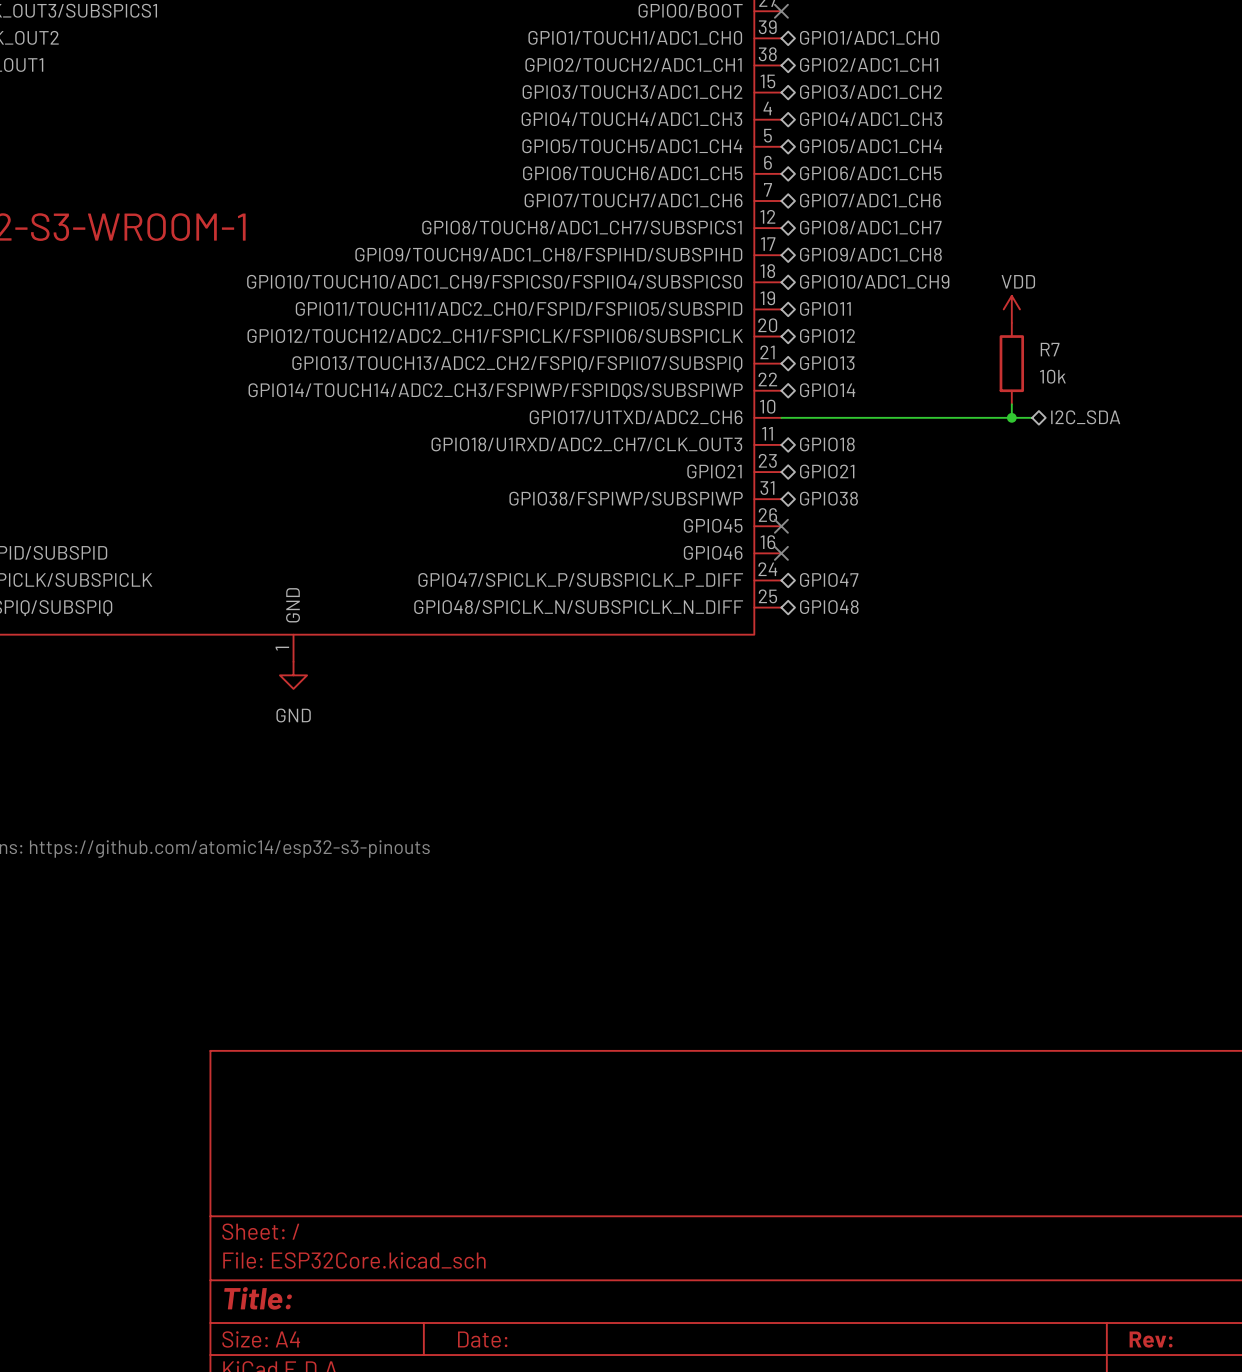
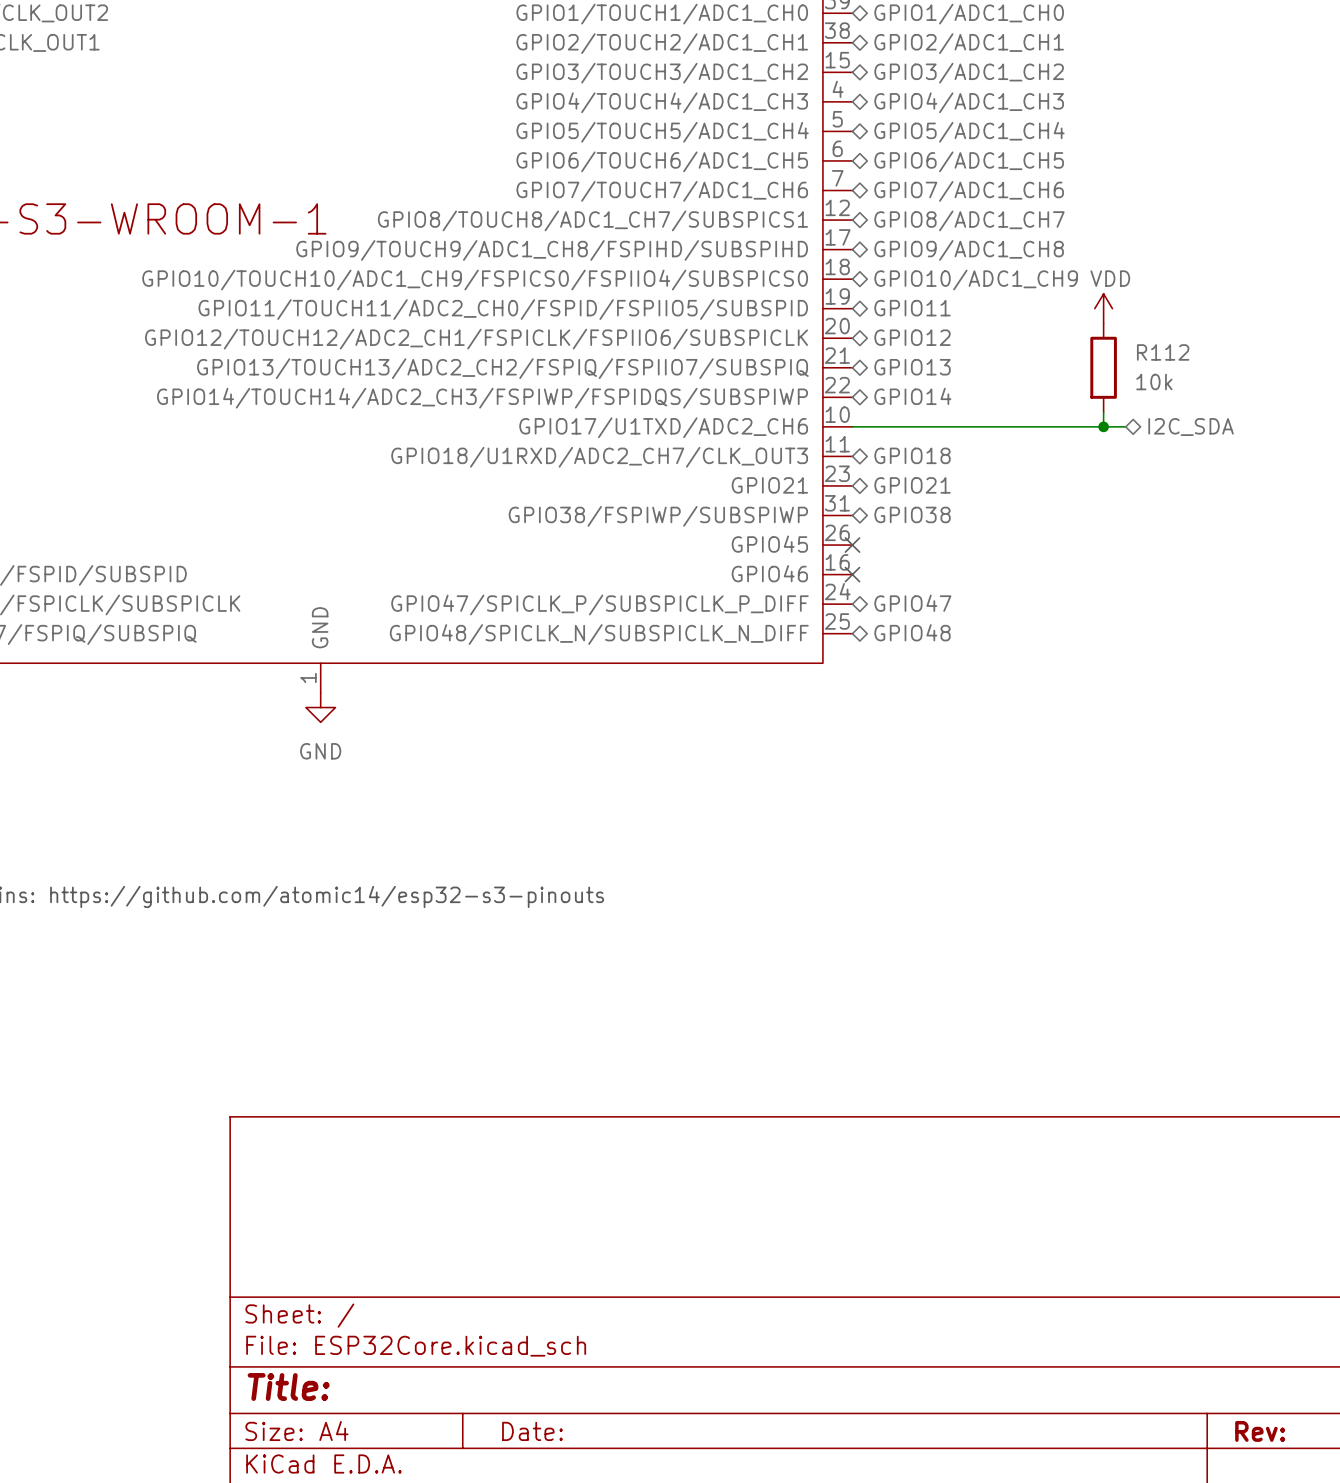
R7 name: R7 (1050, 349) -> R112 (1163, 352)

